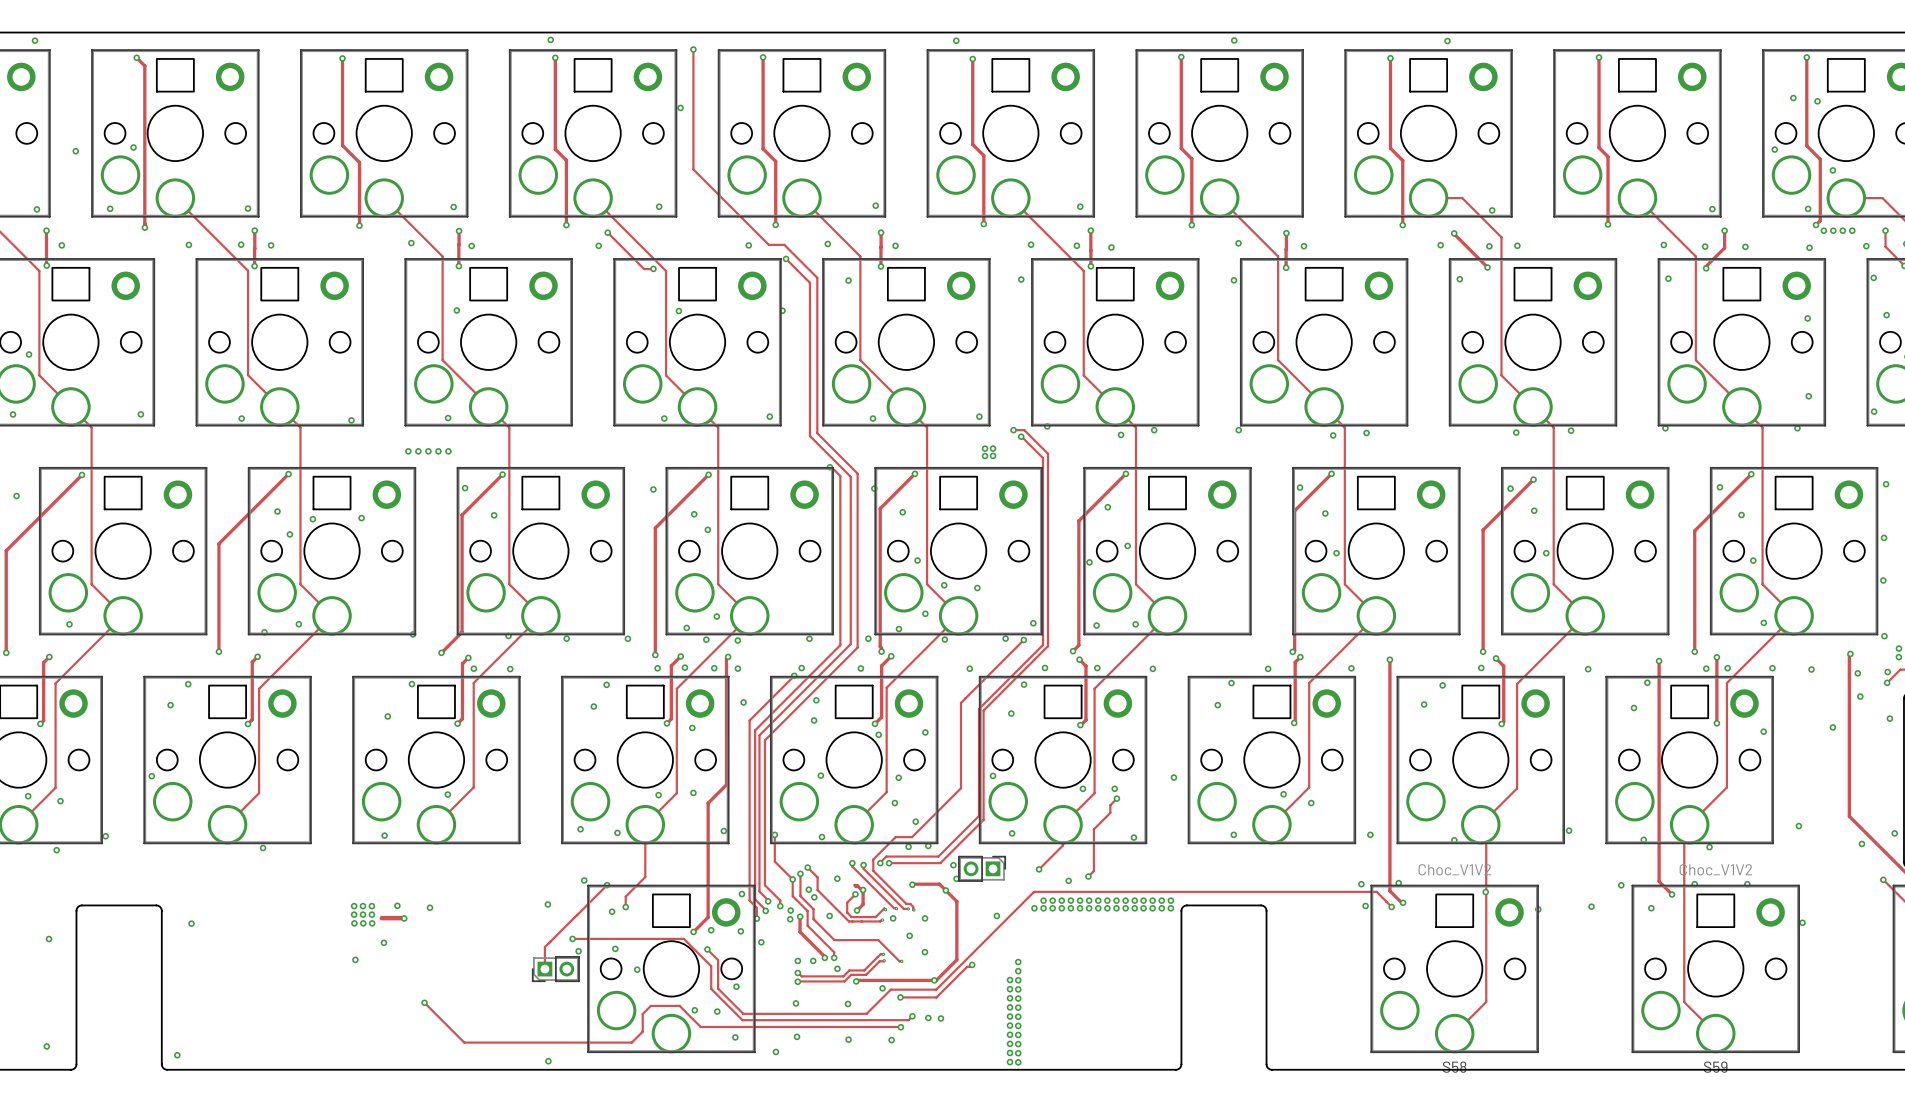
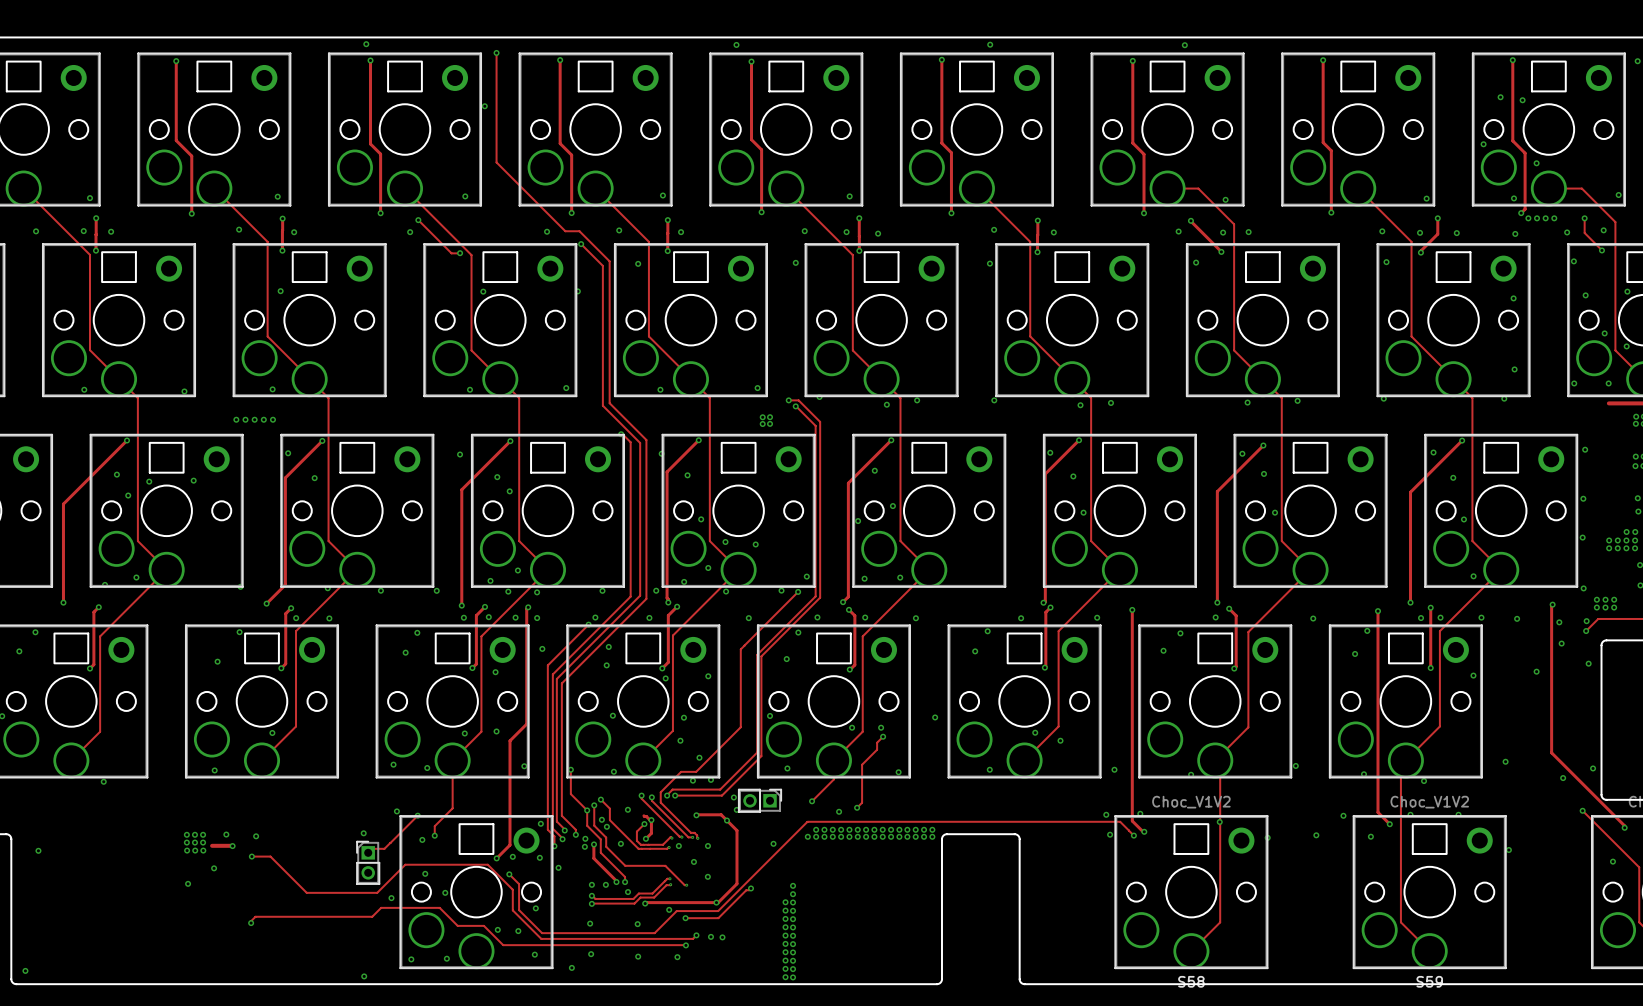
track: (570, 921) (544, 947) (544, 969) -> (384, 848) (372, 848)
via: none -> (251, 856)
track: (572, 938) (593, 938) -> (251, 856) (270, 856) (306, 892) (377, 892) (405, 864)
via: (572, 938) -> none
via: (578, 951) -> none
part rotation: 0° (555, 969) -> 90° clockwise (368, 862)
part position: (555, 969) -> (368, 862)
via: none -> (391, 898)
track: (424, 1002) (464, 1042) (631, 1042) (642, 1031) (642, 1014) (650, 1005) -> (251, 923) (255, 916) (372, 916) (381, 907) (439, 907) (457, 925)
via: none -> (446, 958)
via: none -> (411, 959)

